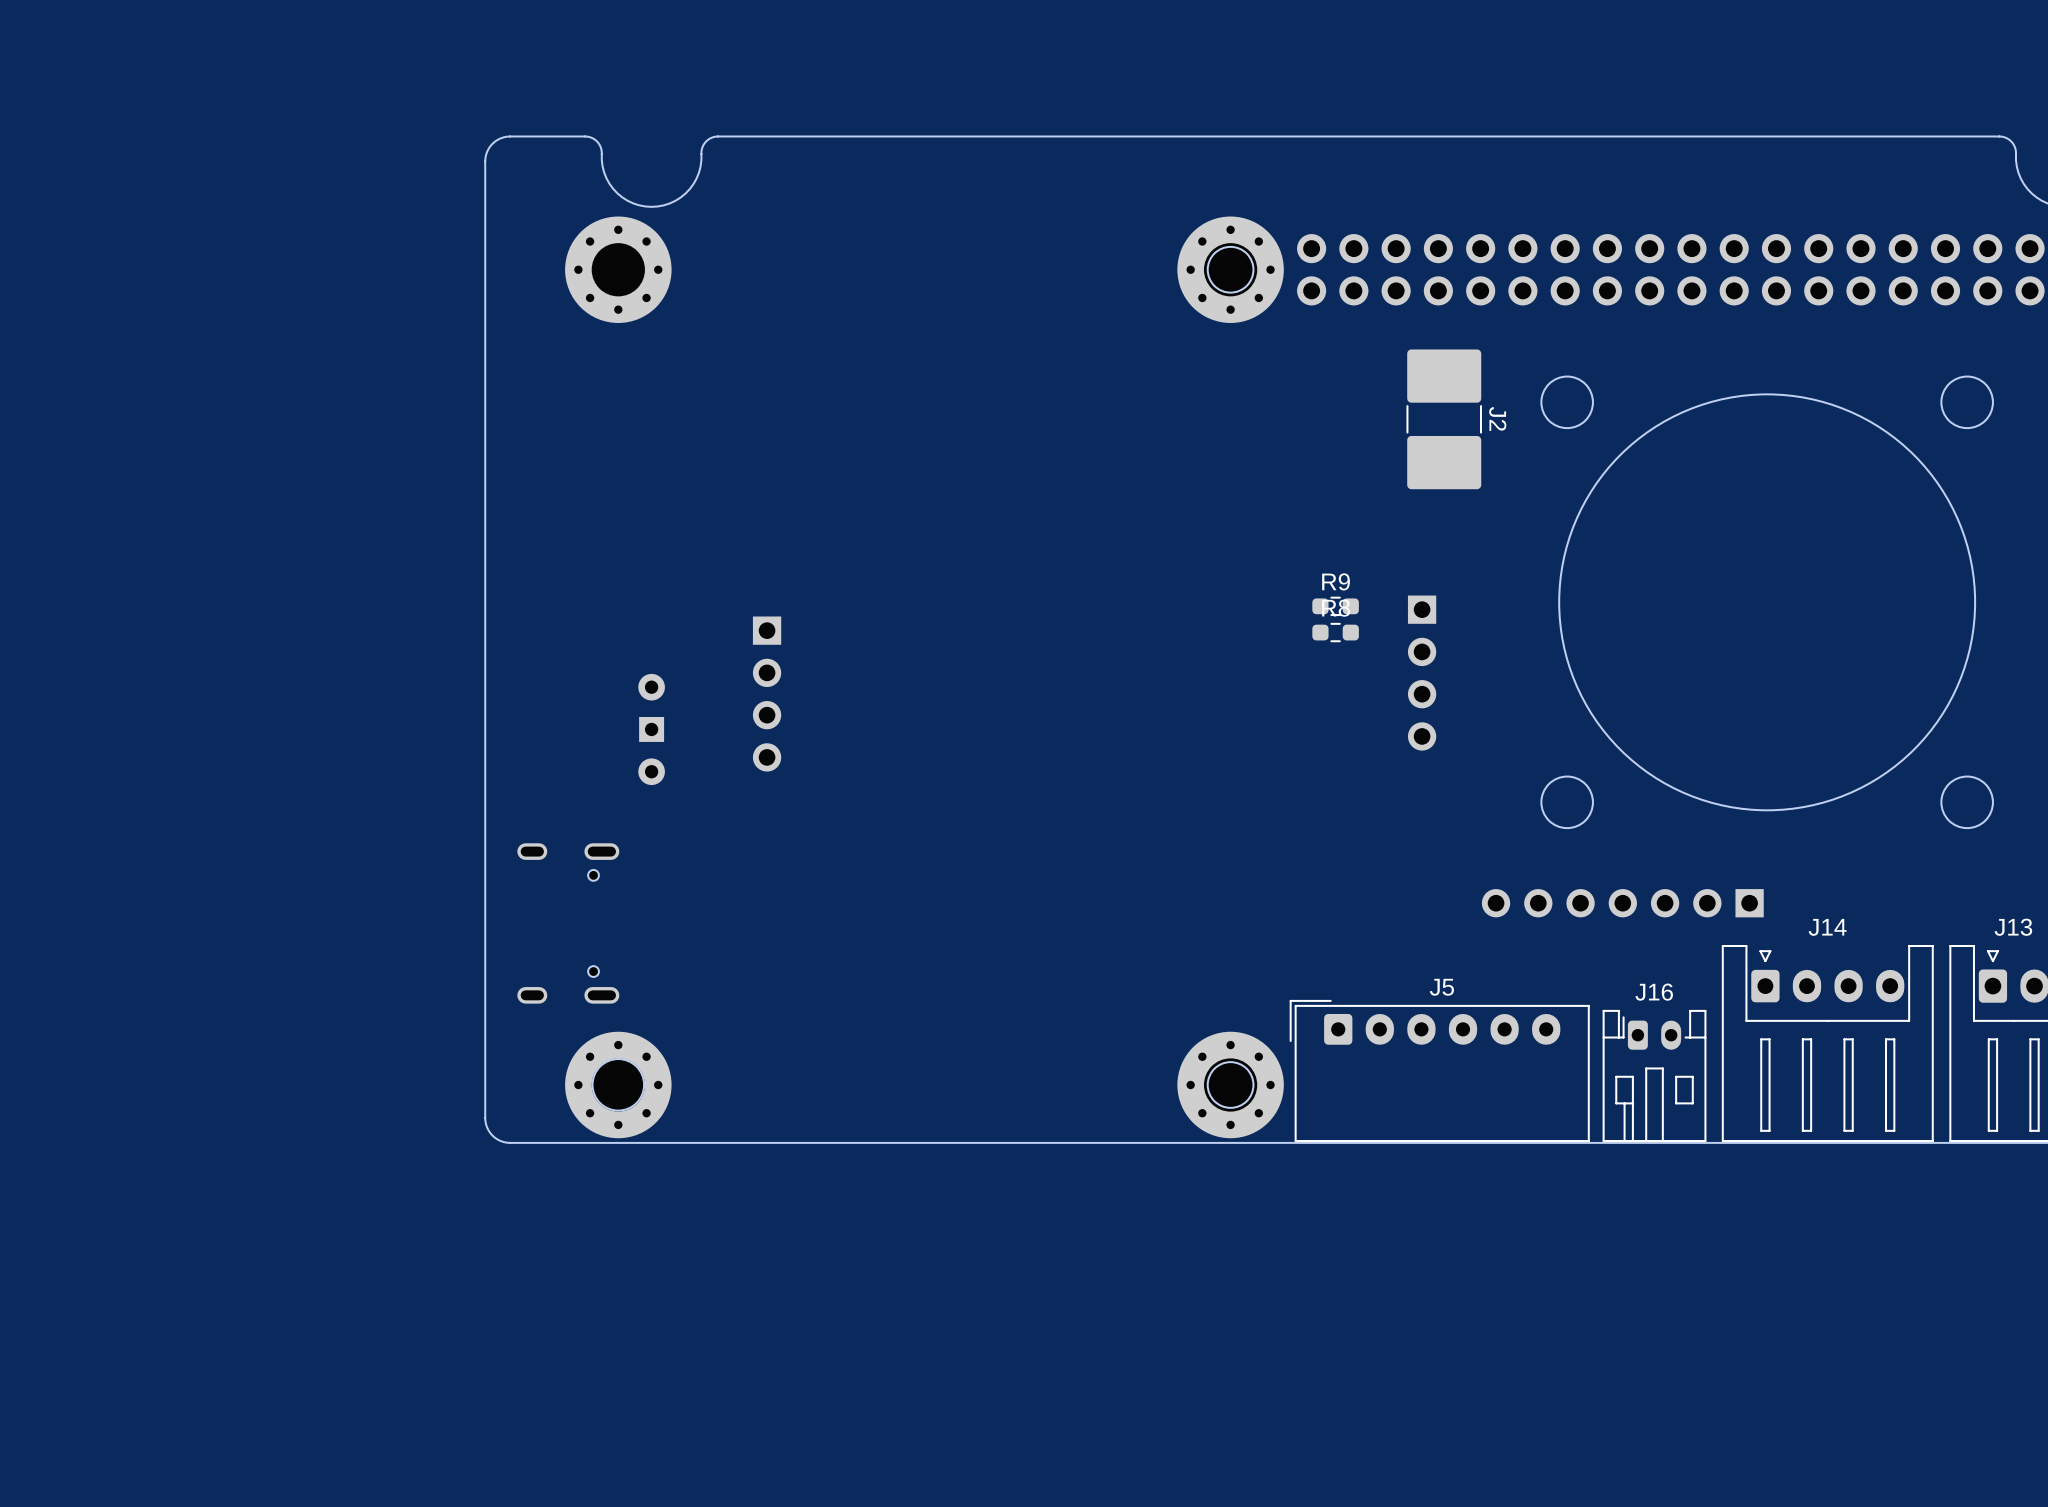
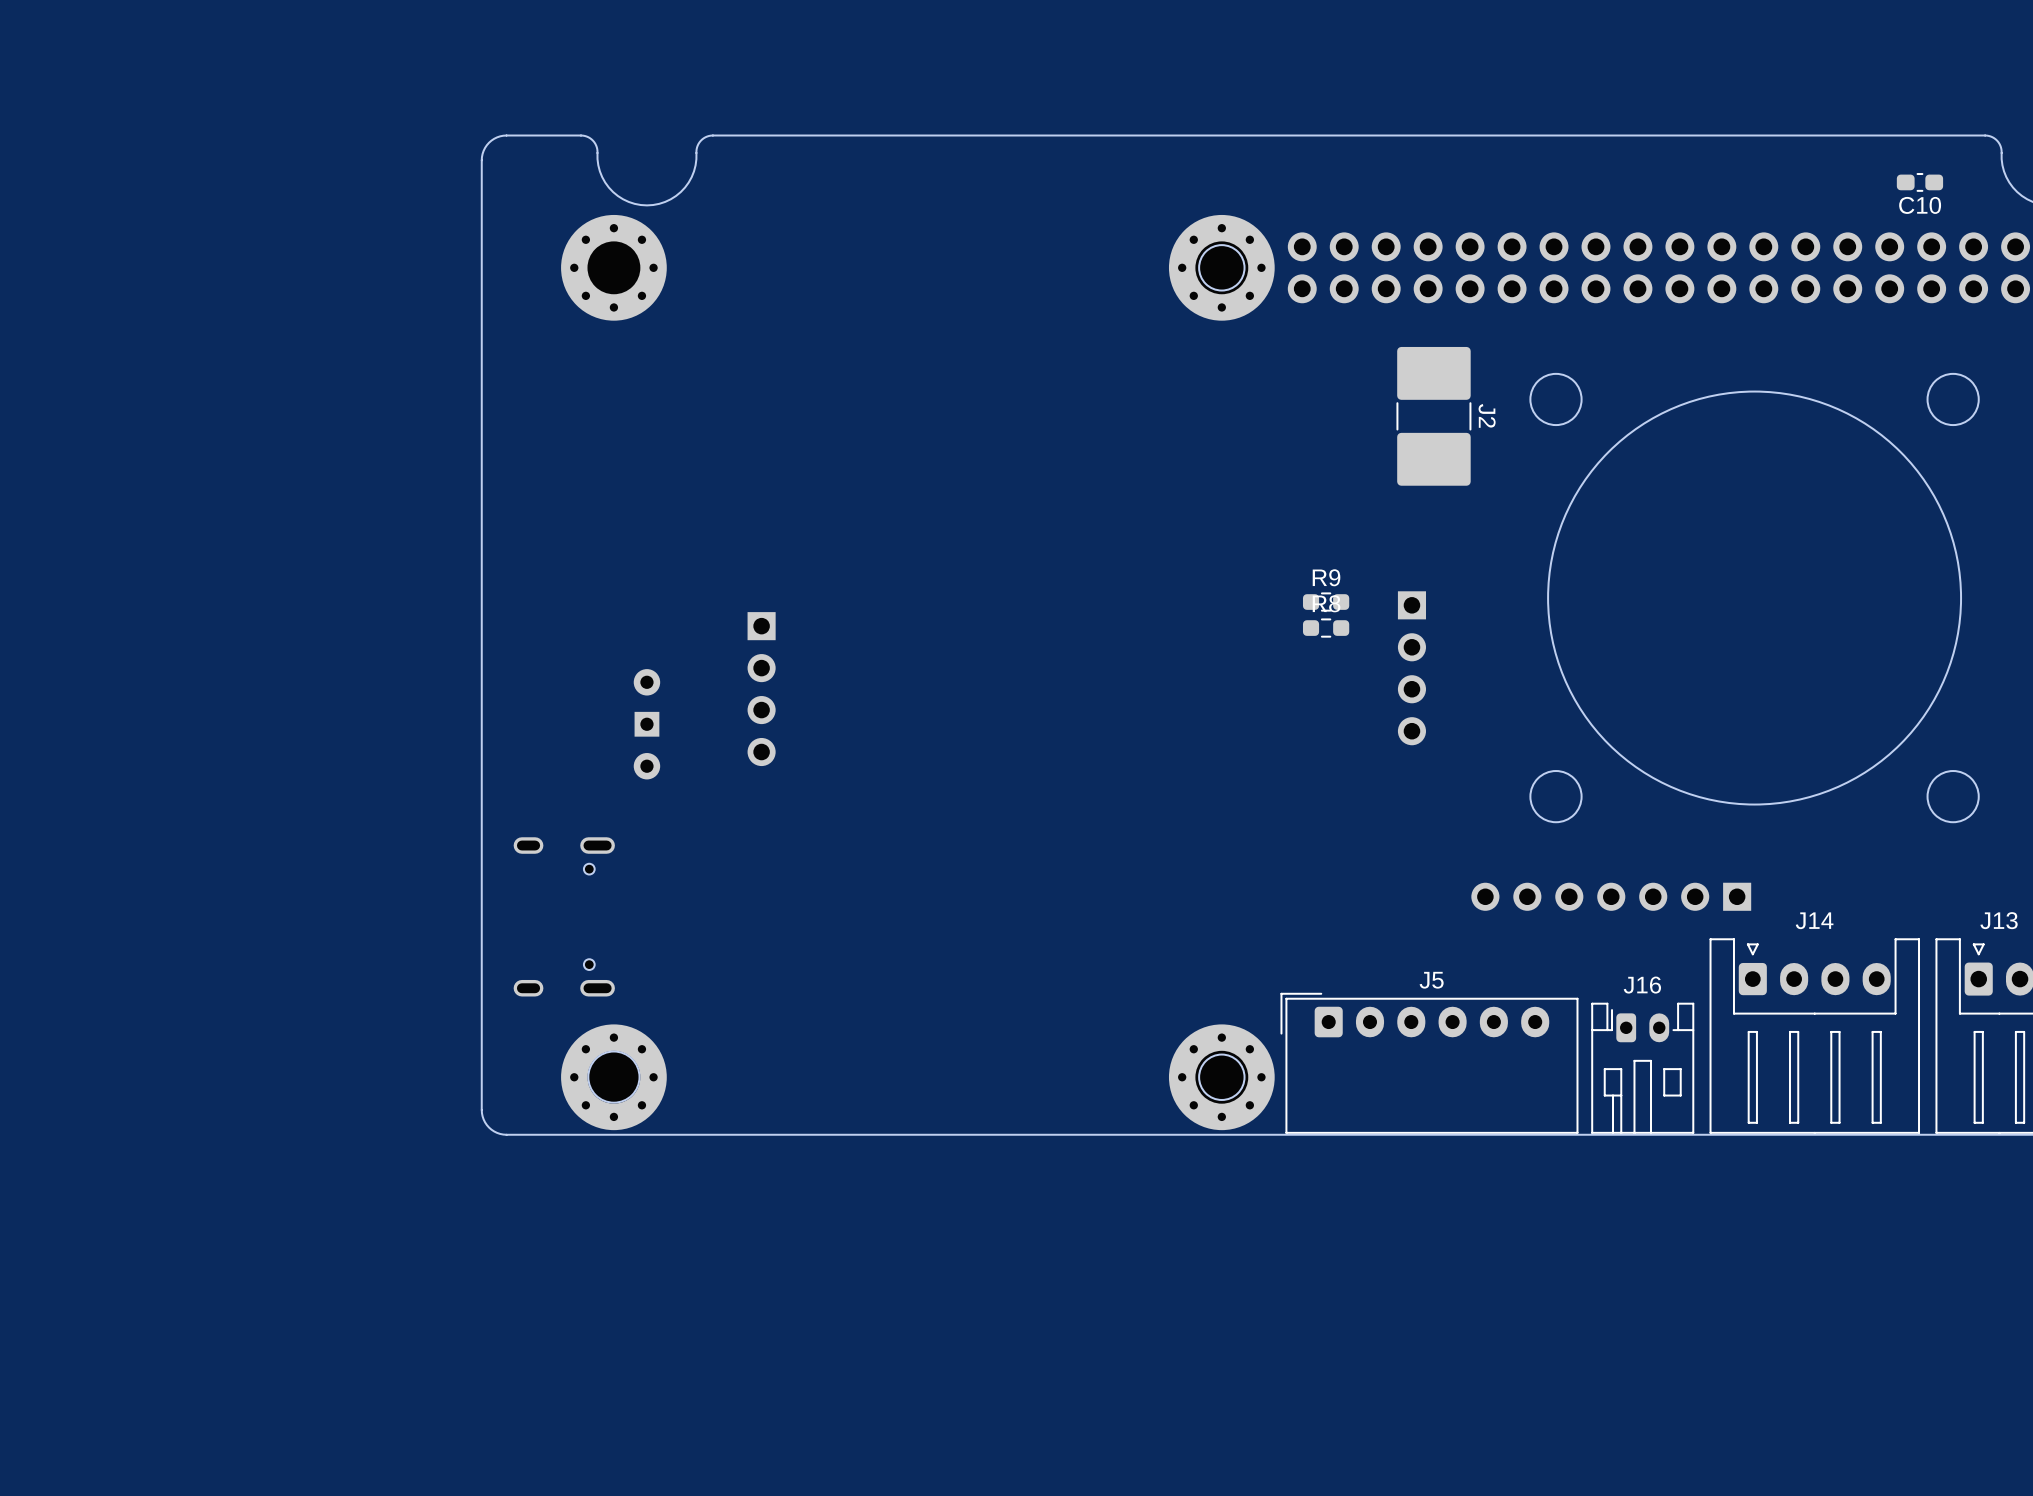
C10: none -> (1919, 182)

